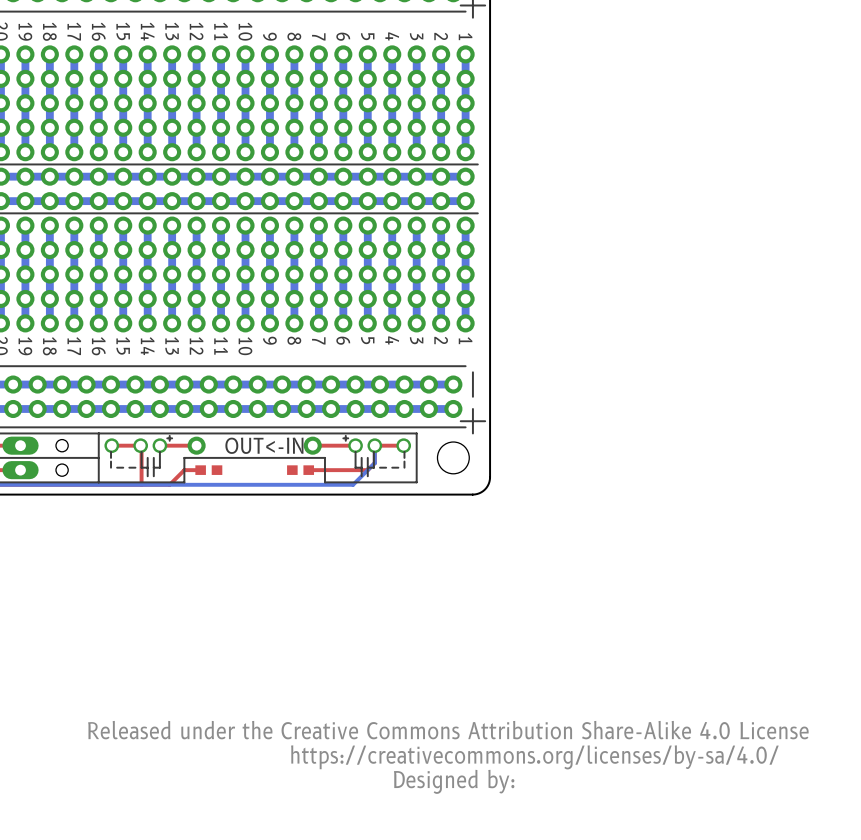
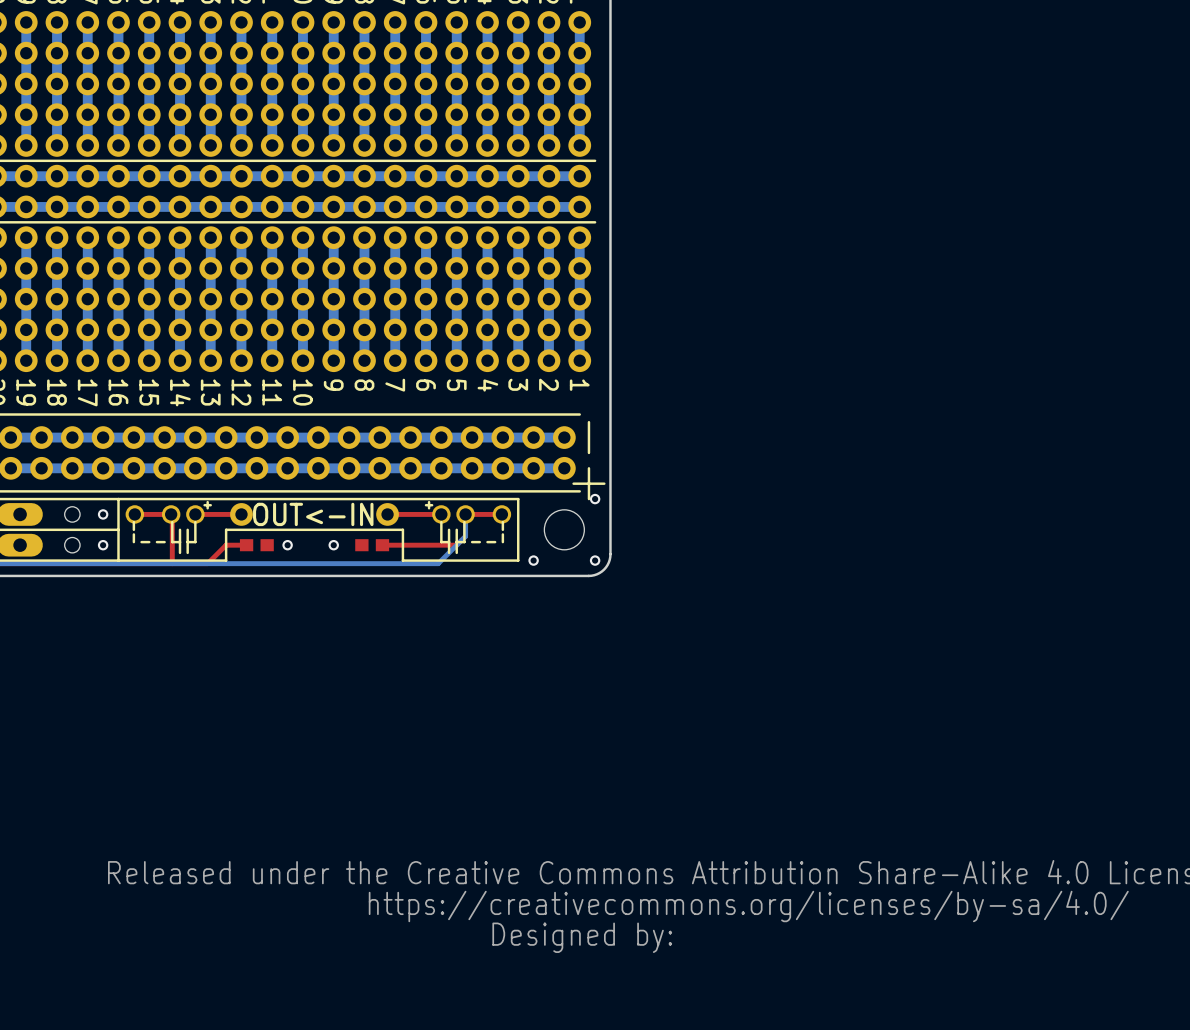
via: none -> (595, 499)
via: none -> (103, 514)
via: none -> (103, 545)
via: none -> (287, 545)
via: none -> (333, 545)
via: none -> (533, 560)
via: none -> (595, 560)

